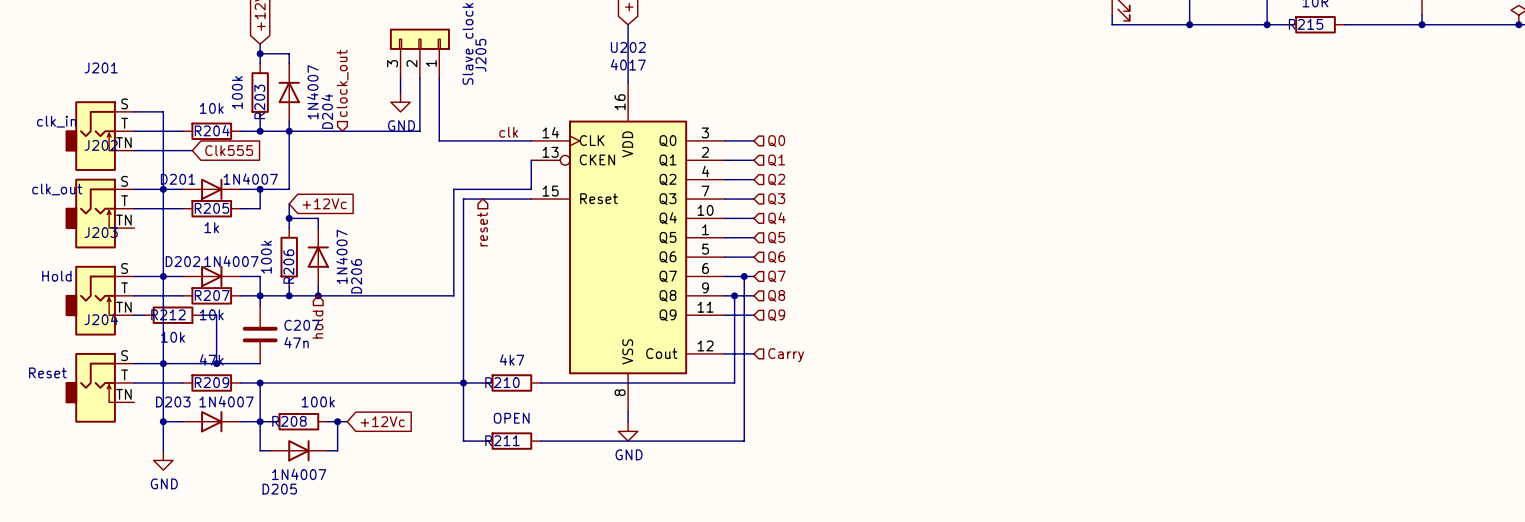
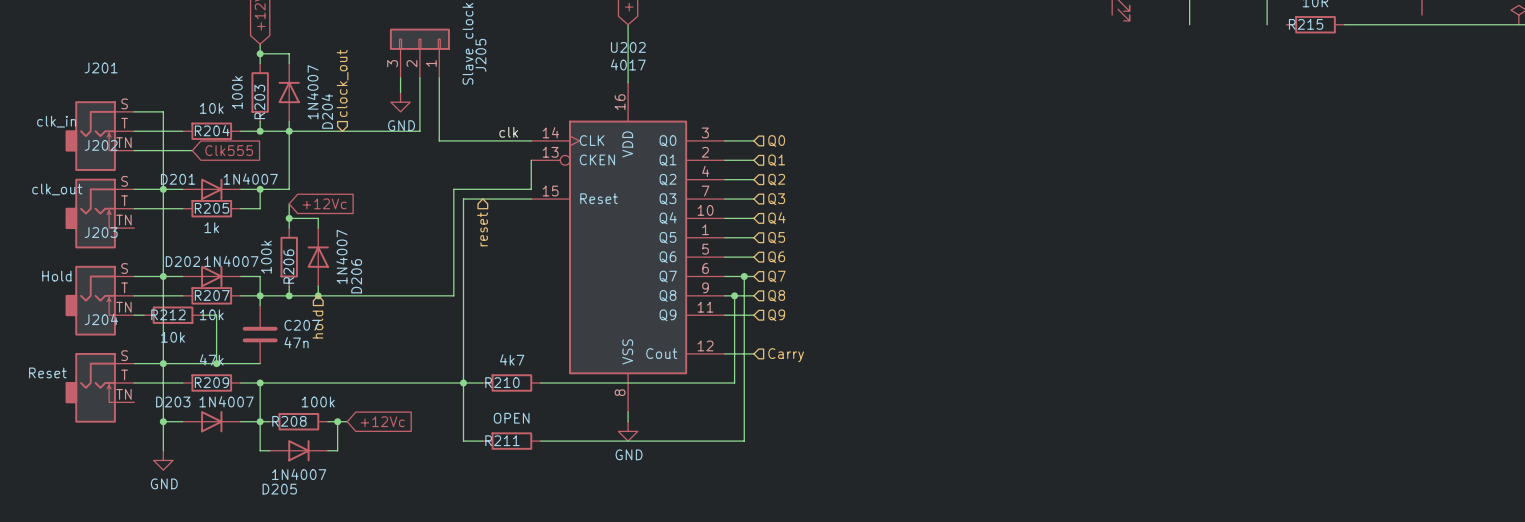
wire: (1112, 15) (1112, 24) (1286, 24) -> none
wire: (1422, 15) (1422, 24) -> none
junction: (1189, 24) -> none
junction: (1267, 24) -> none
junction: (1422, 24) -> none
junction: (1518, 24) -> none

